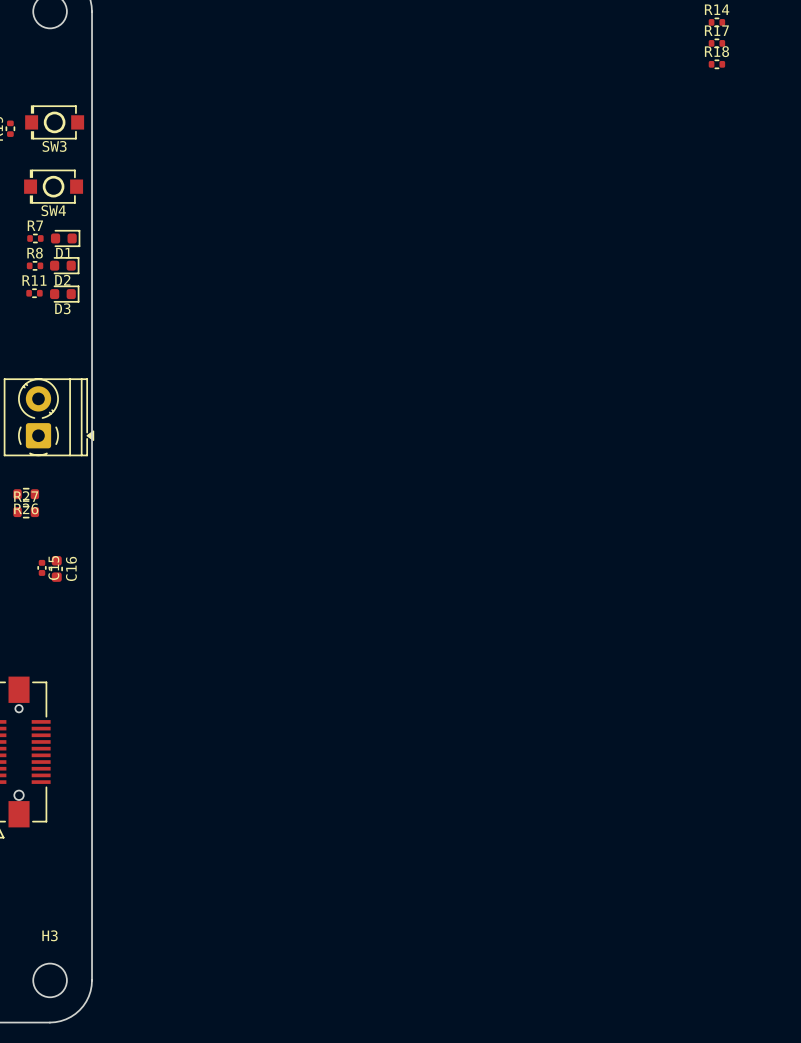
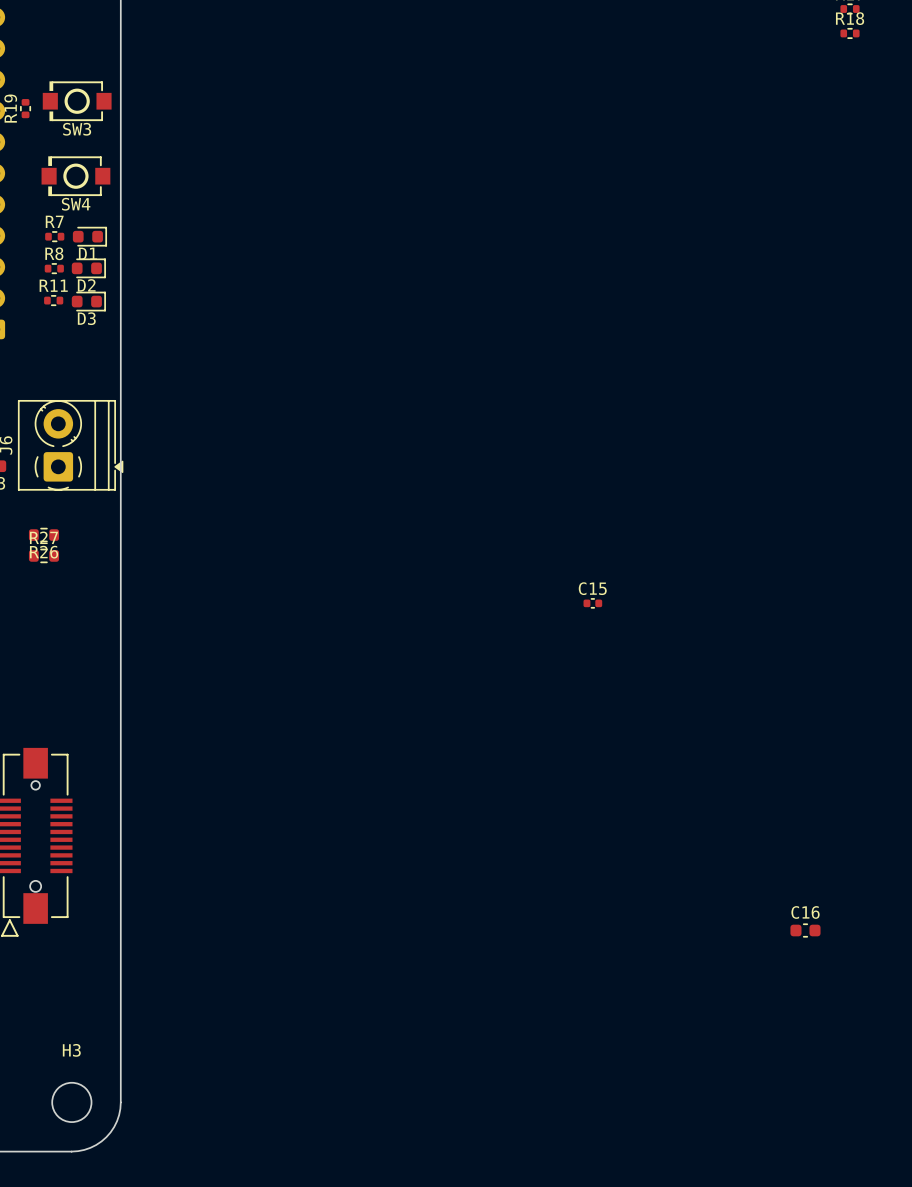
C15 rotation: 0° (41, 567) -> 90° clockwise (592, 603)
C15 position: (41, 567) -> (592, 603)
C16 rotation: 0° (56, 568) -> 90° clockwise (805, 930)
C16 position: (56, 568) -> (805, 930)
C16 name position: C16 (71, 568) -> C16 (805, 912)

